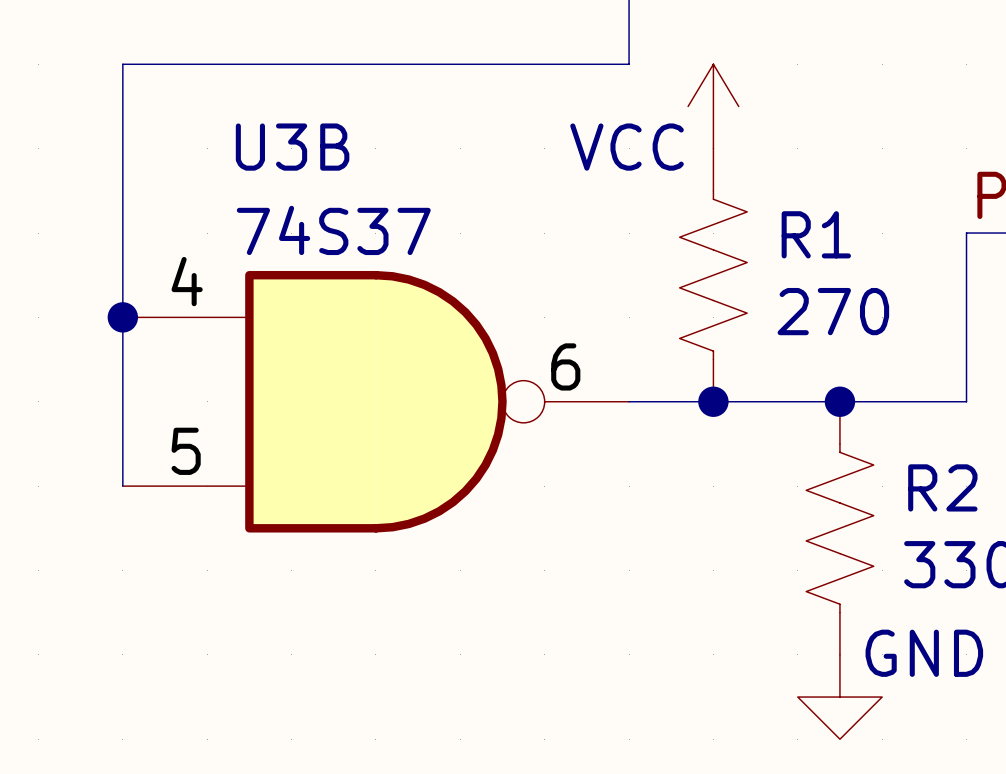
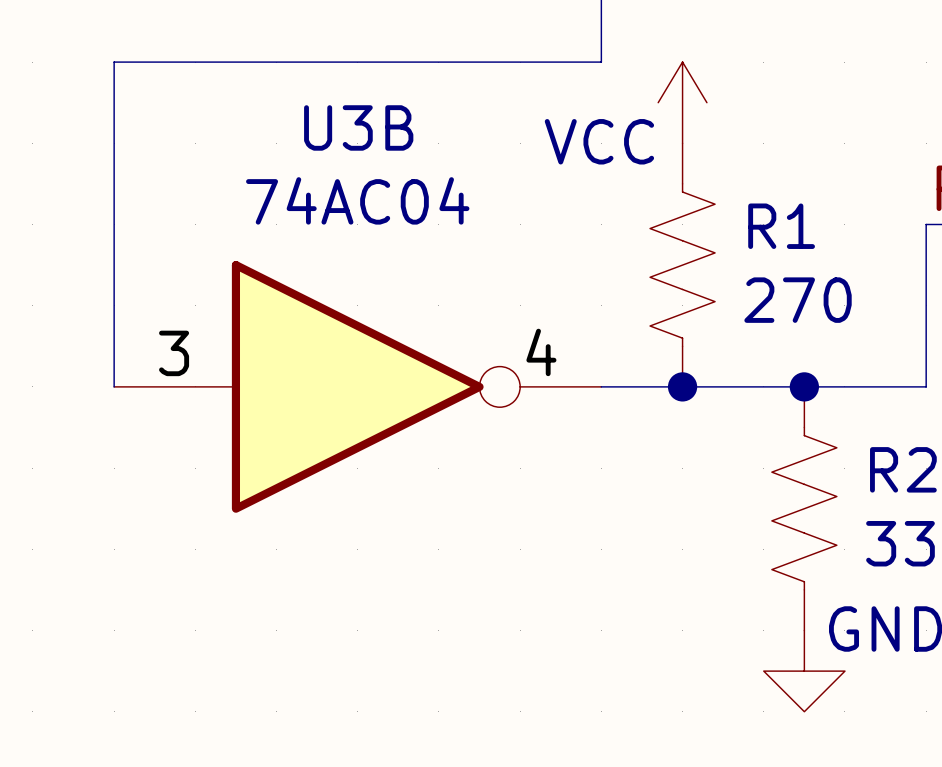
U3B name position: U3B (292, 147) -> U3B (358, 127)
U3B value: 74S37 (333, 230) -> 74AC04 (357, 200)
U3B symbol: [122, 270, 630, 533] -> [114, 261, 602, 513]
junction: (122, 317) -> none
wire: (122, 401) (122, 486) -> none

